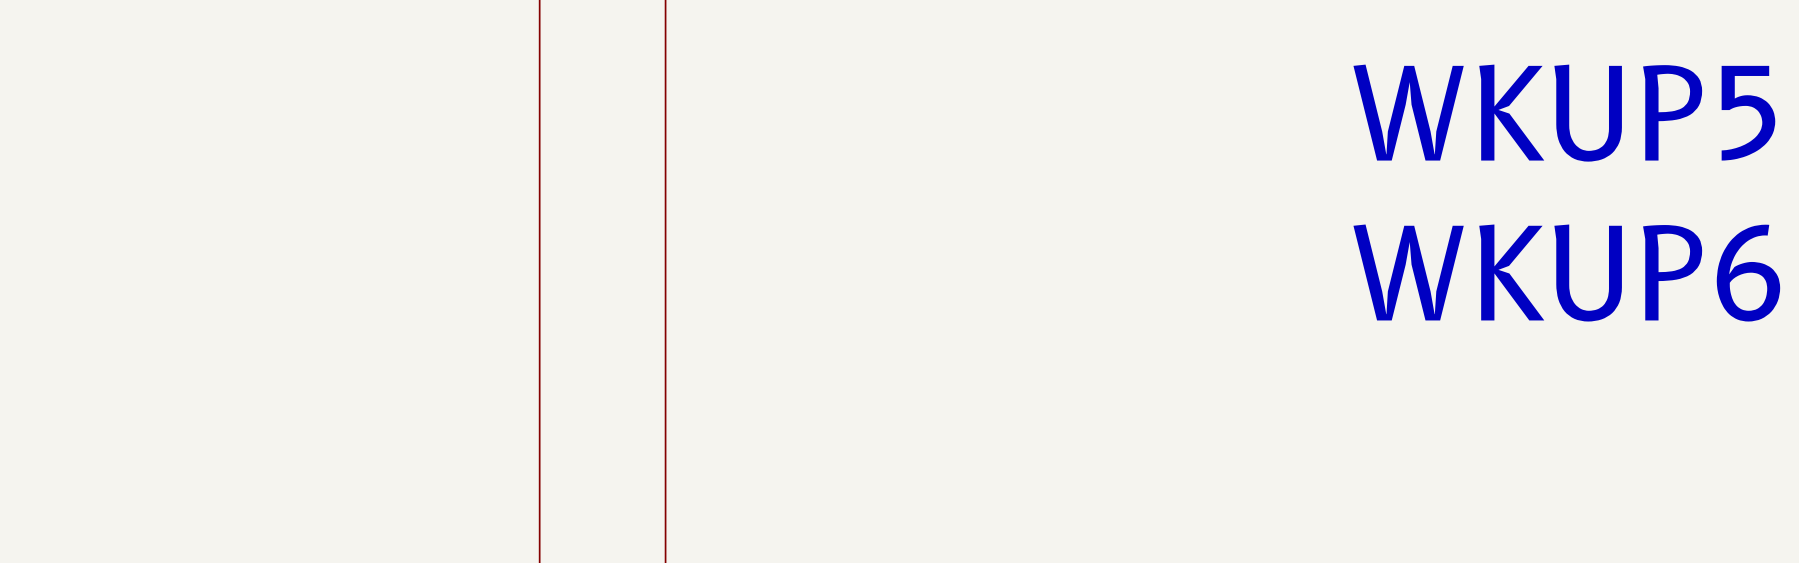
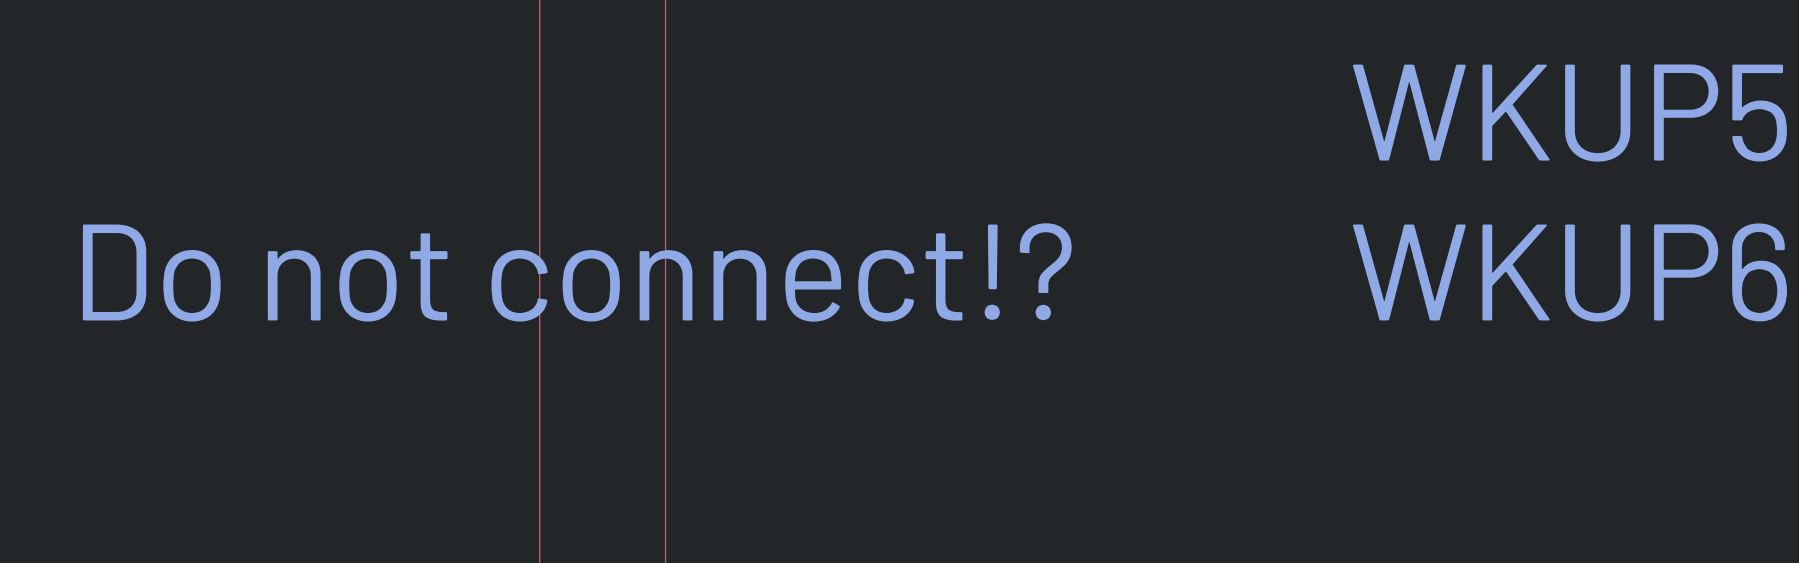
text: none -> Do not connect!? (577, 272)

